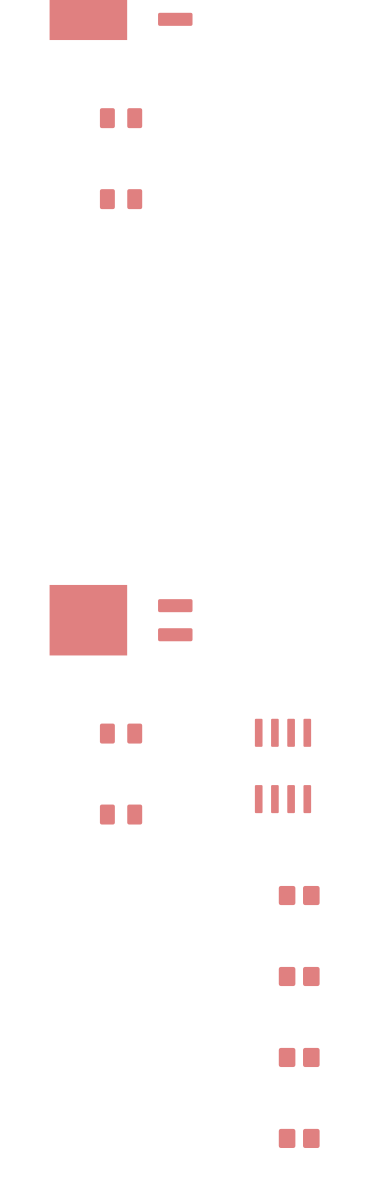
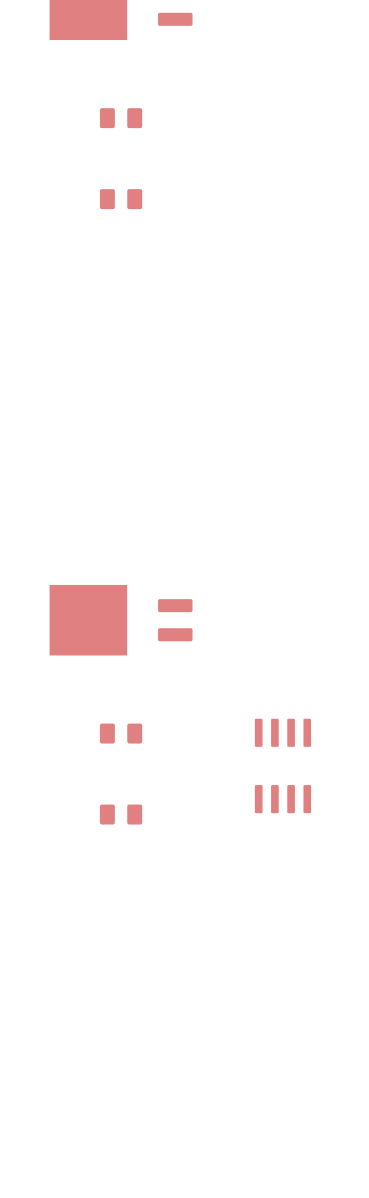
part: (299, 895) -> none
part: (299, 976) -> none
part: (299, 1057) -> none
part: (299, 1138) -> none

